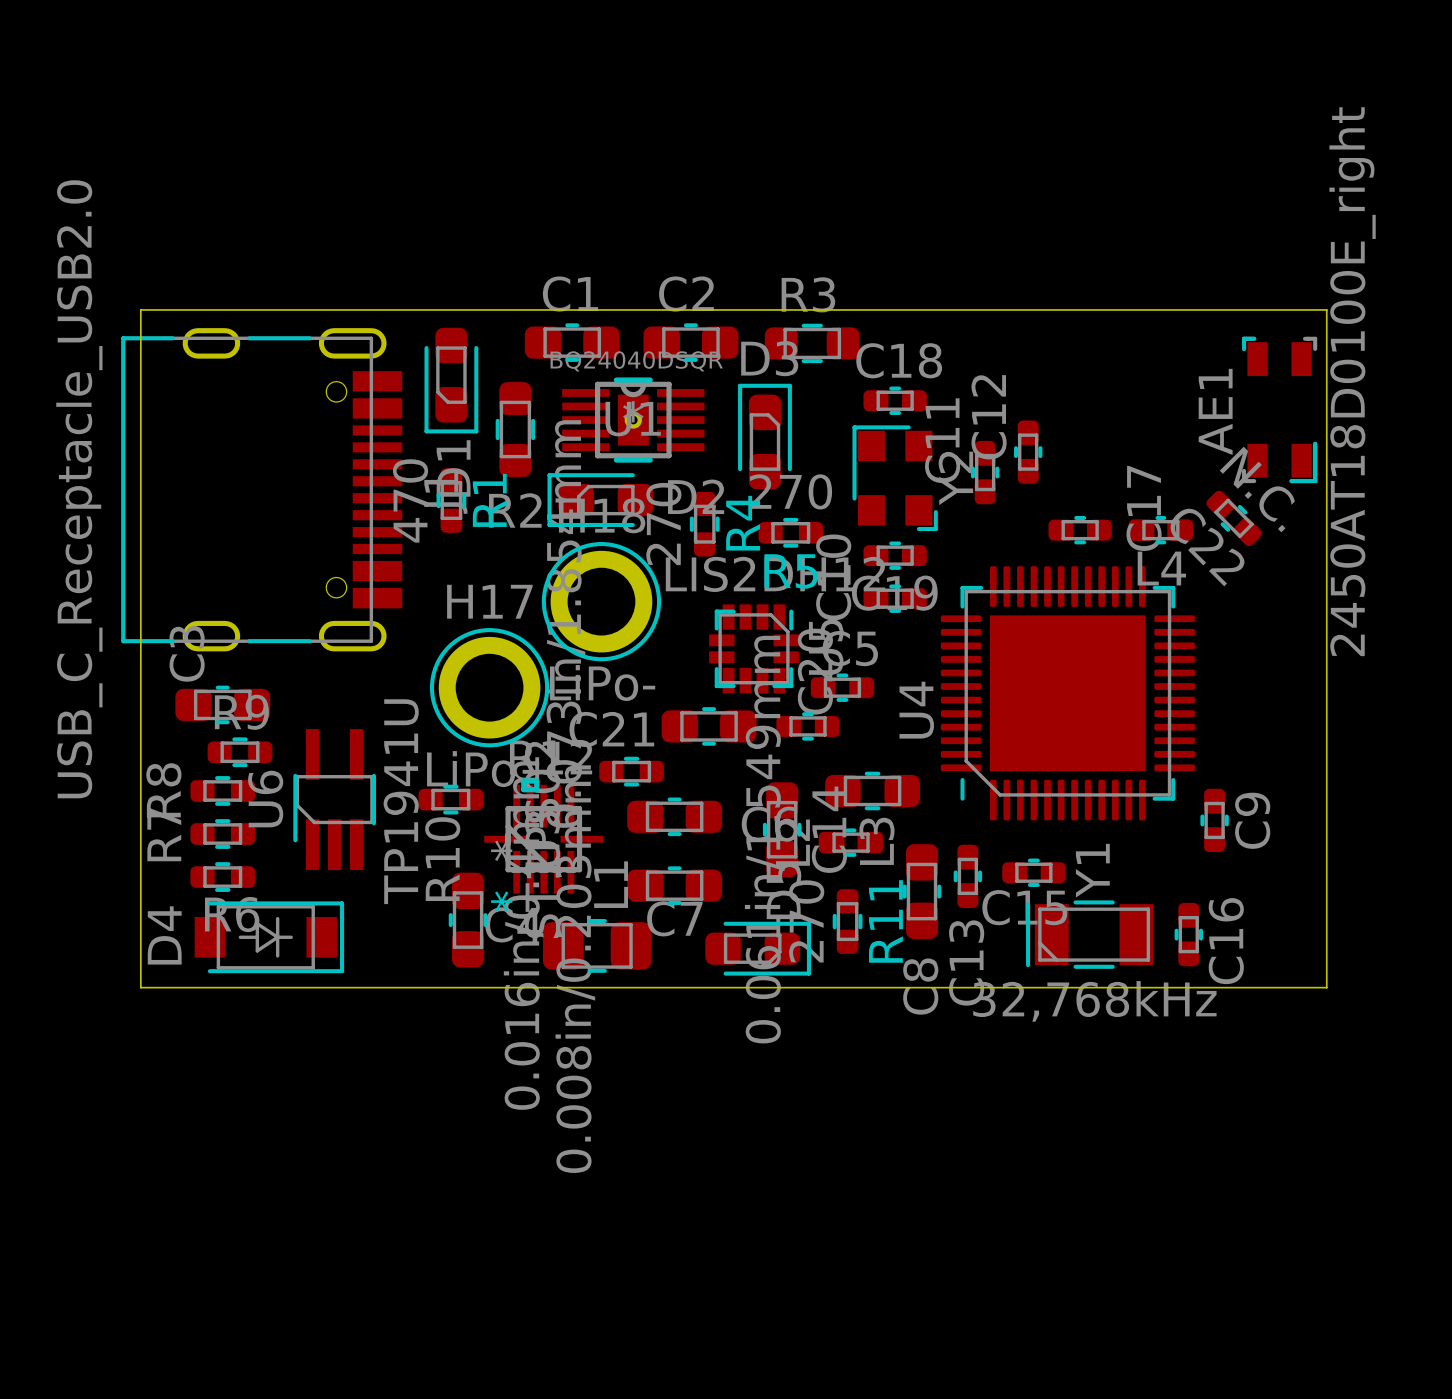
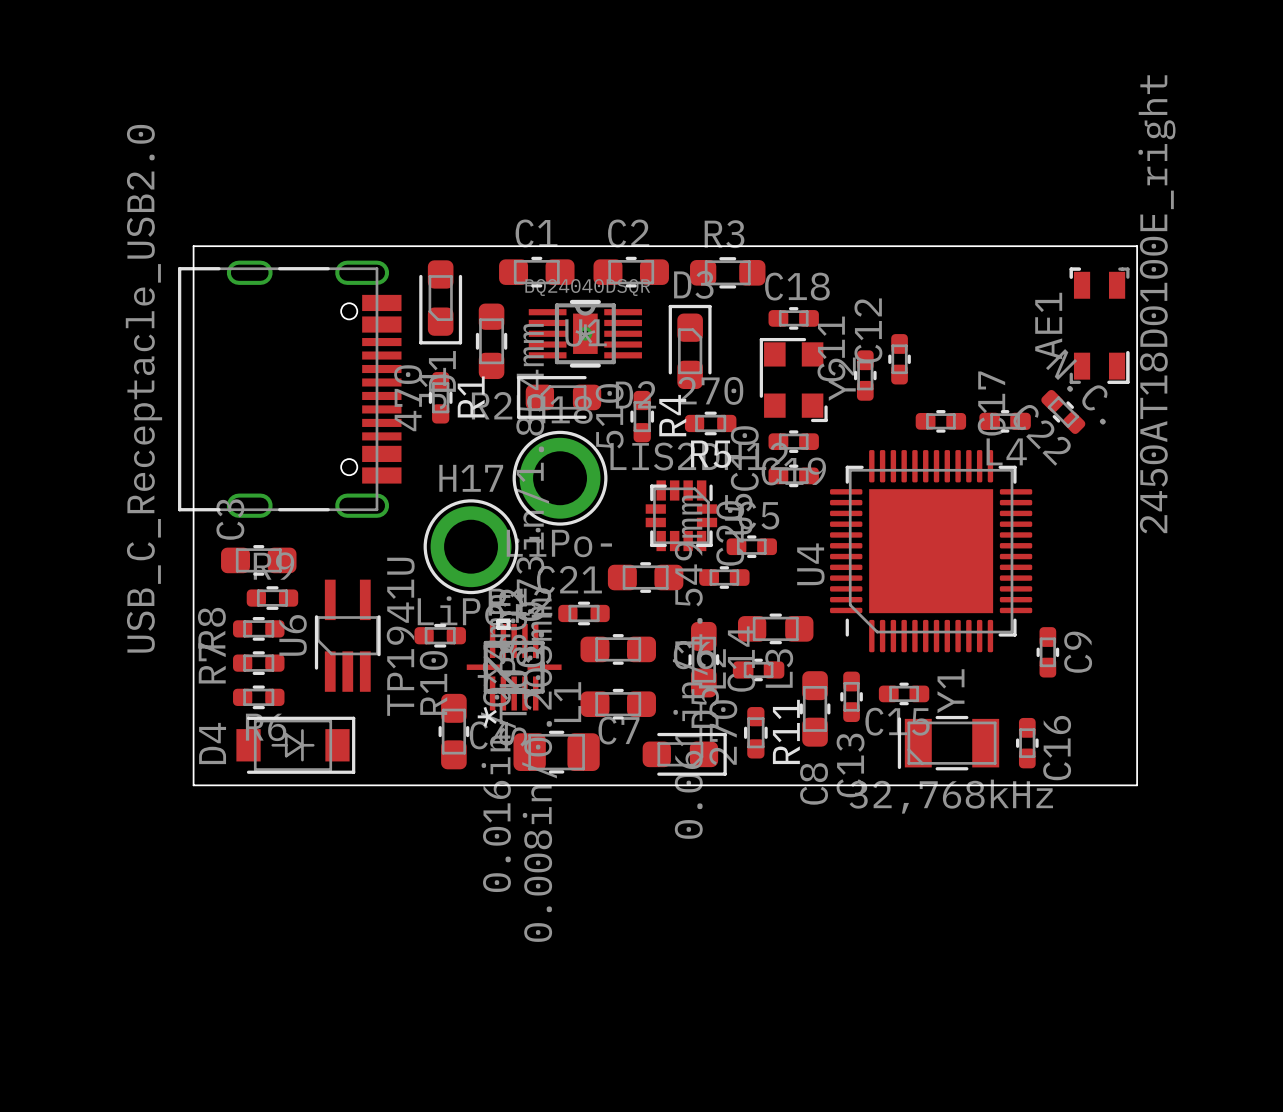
R4 value: 270 (663, 524) -> 510 (609, 416)

